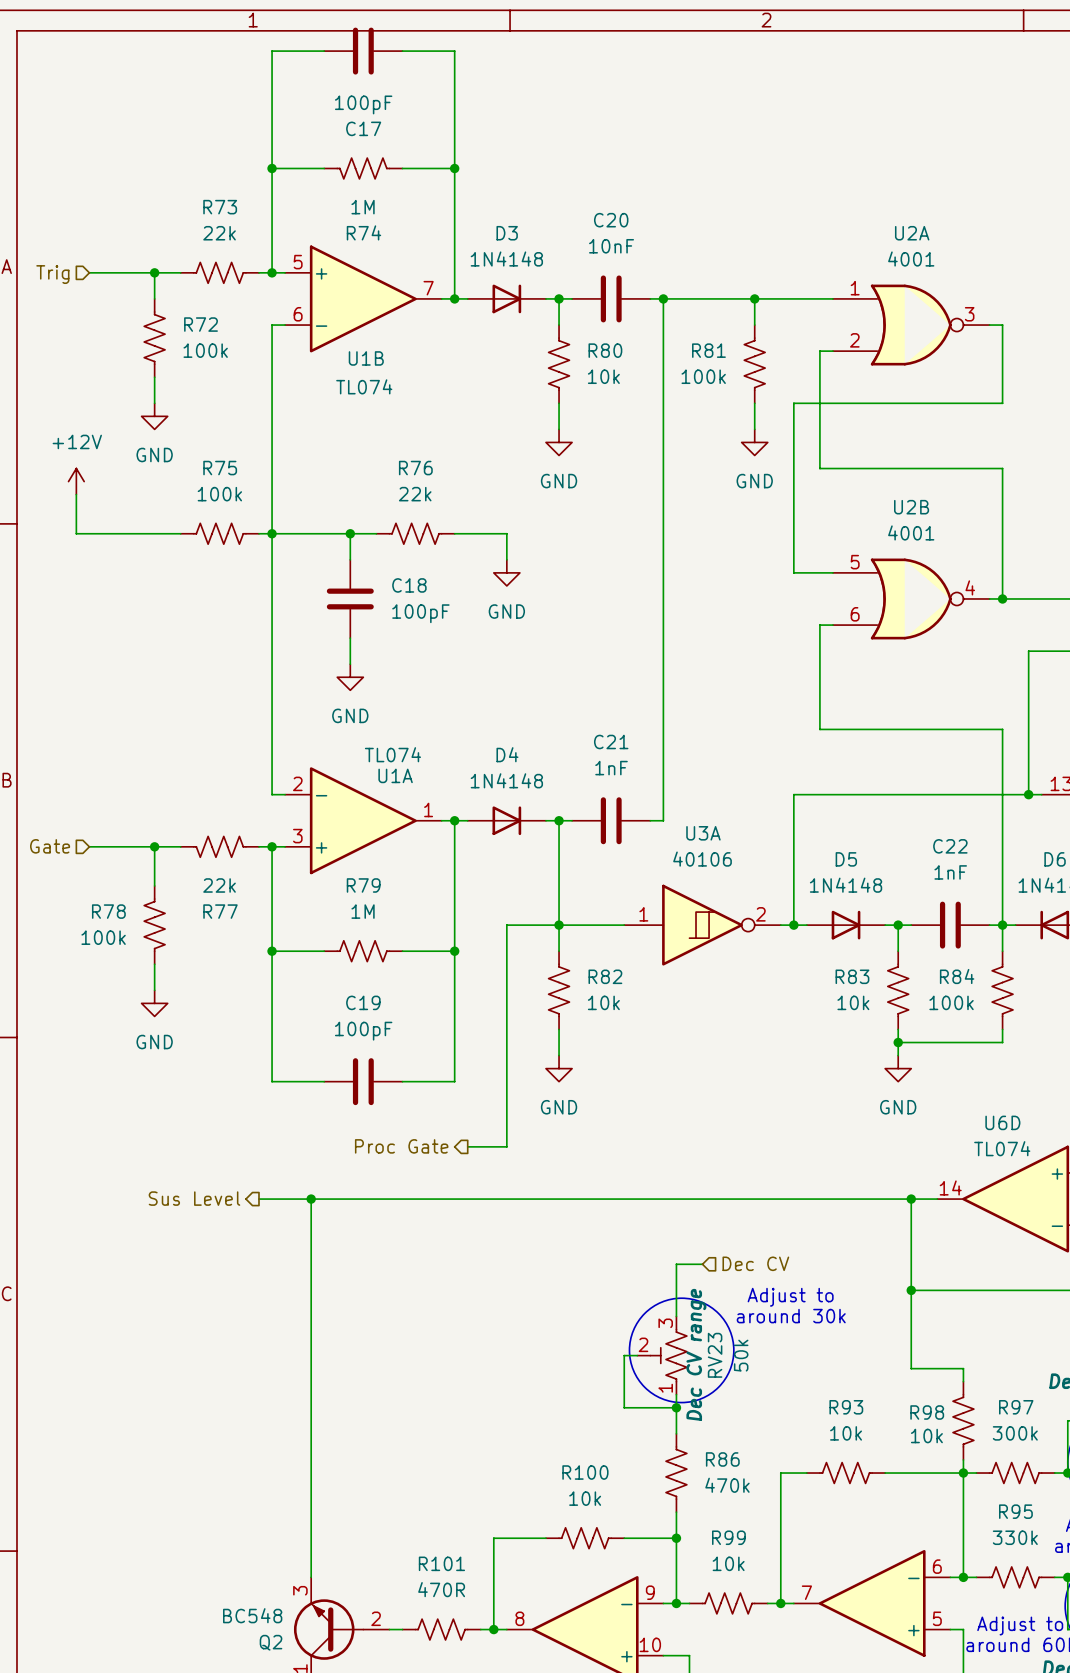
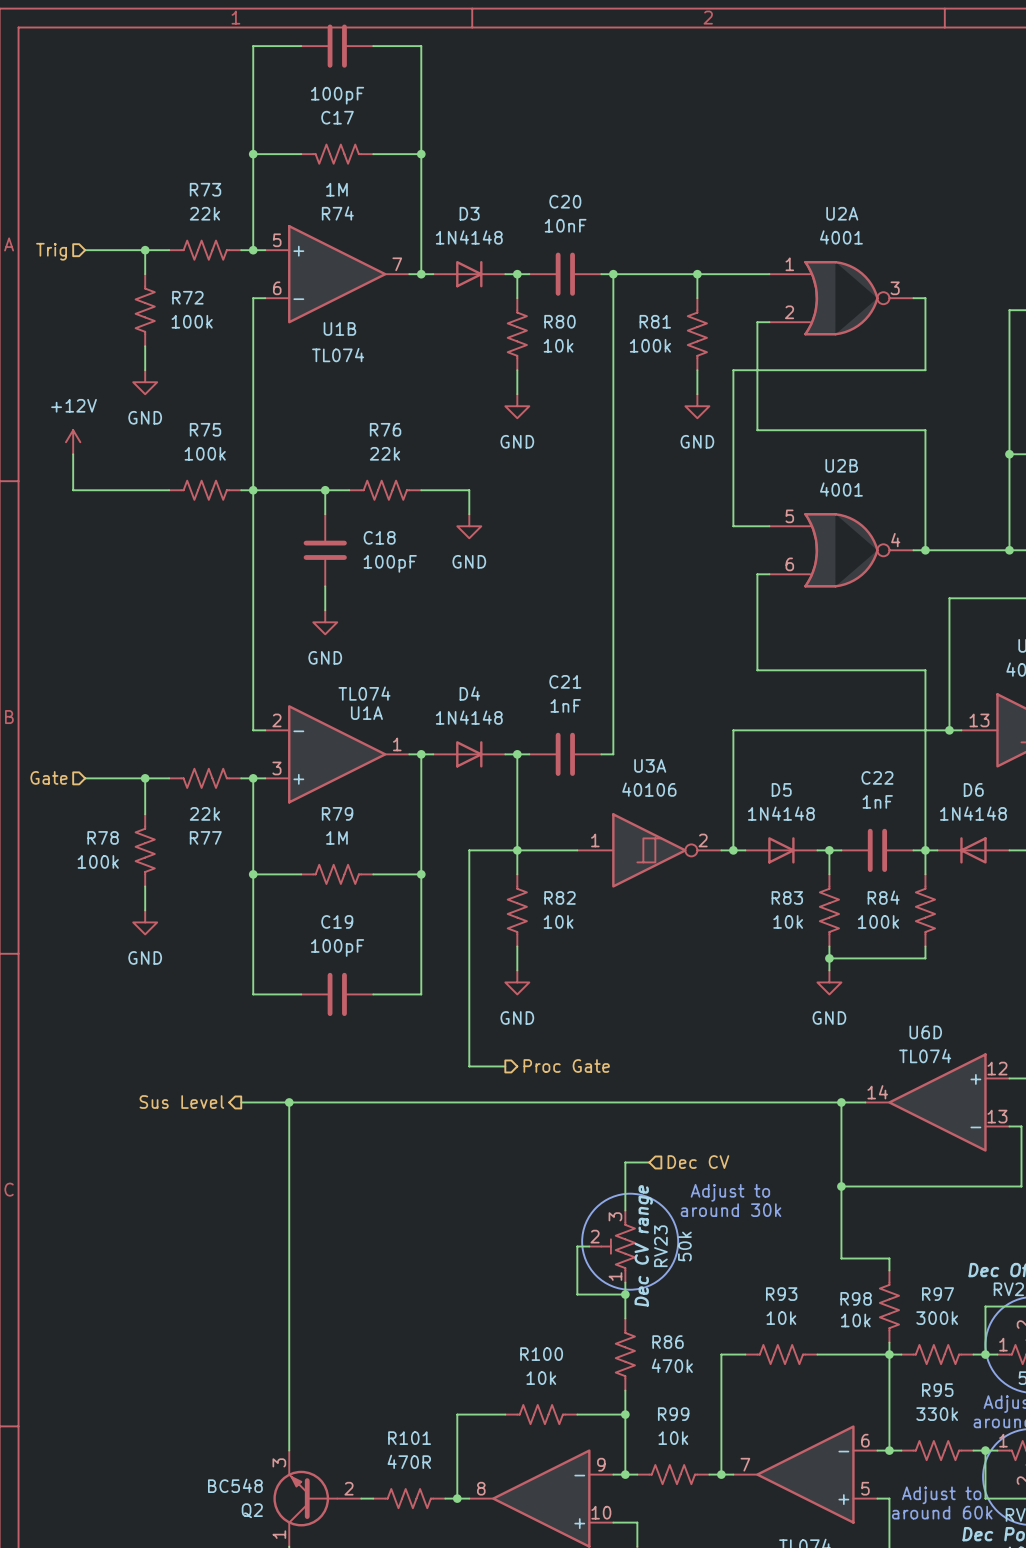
hierarchical label rotation: 0° (401, 1146) -> 180° (566, 1066)
hierarchical label position: Proc Gate (401, 1146) -> Proc Gate (566, 1066)
wire: (467, 1146) (506, 1146) -> (505, 1066) (469, 1066) (469, 1054)

